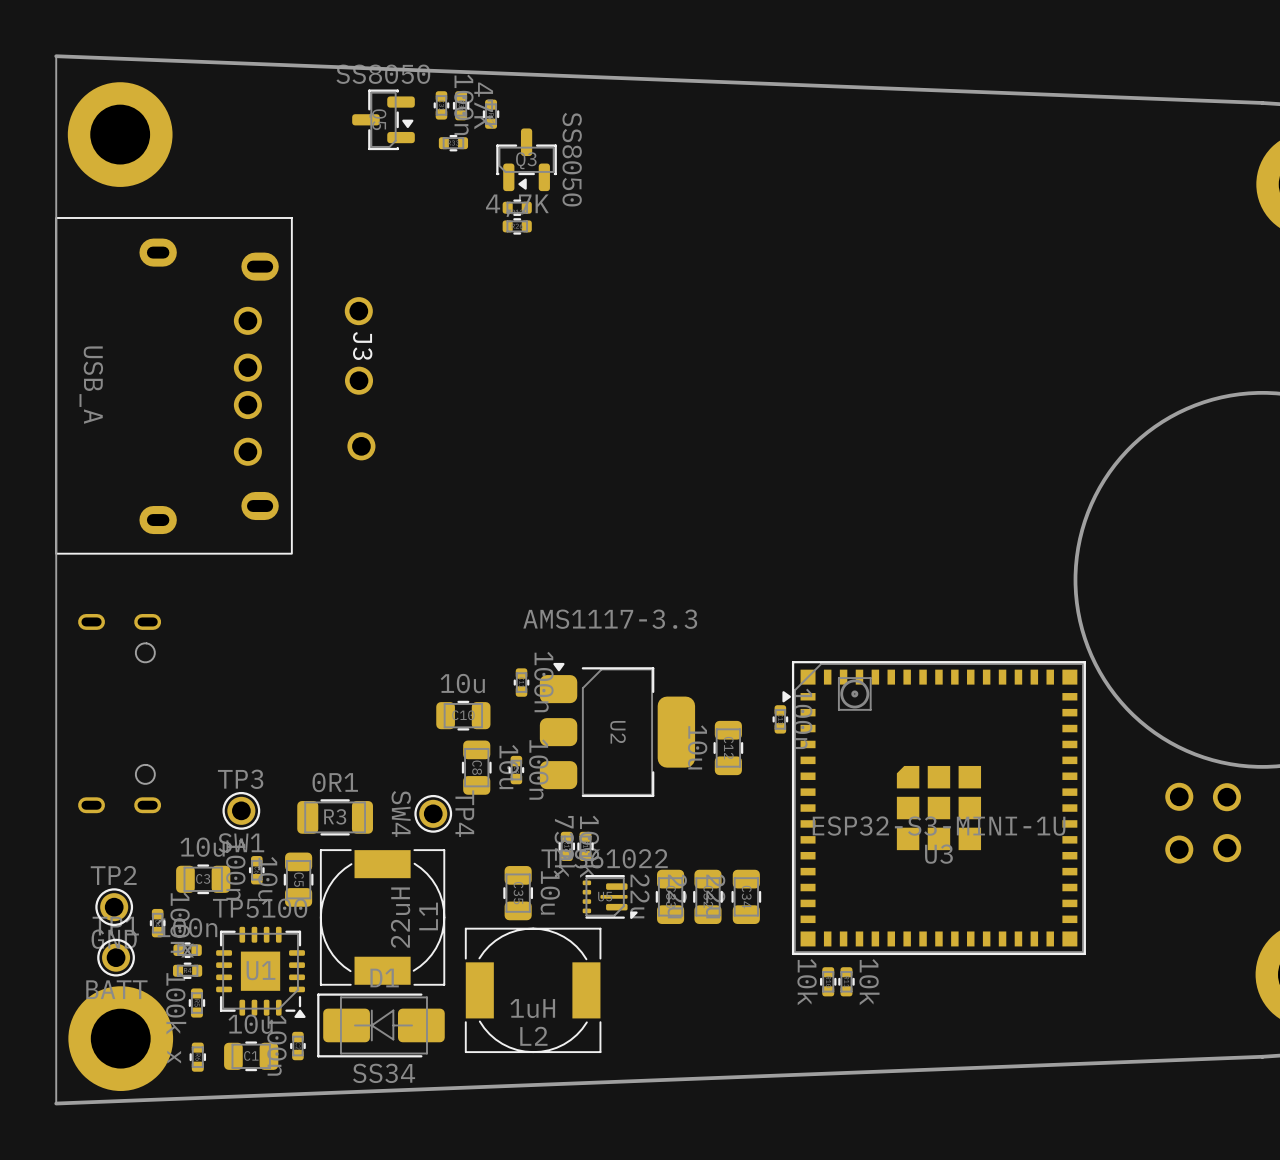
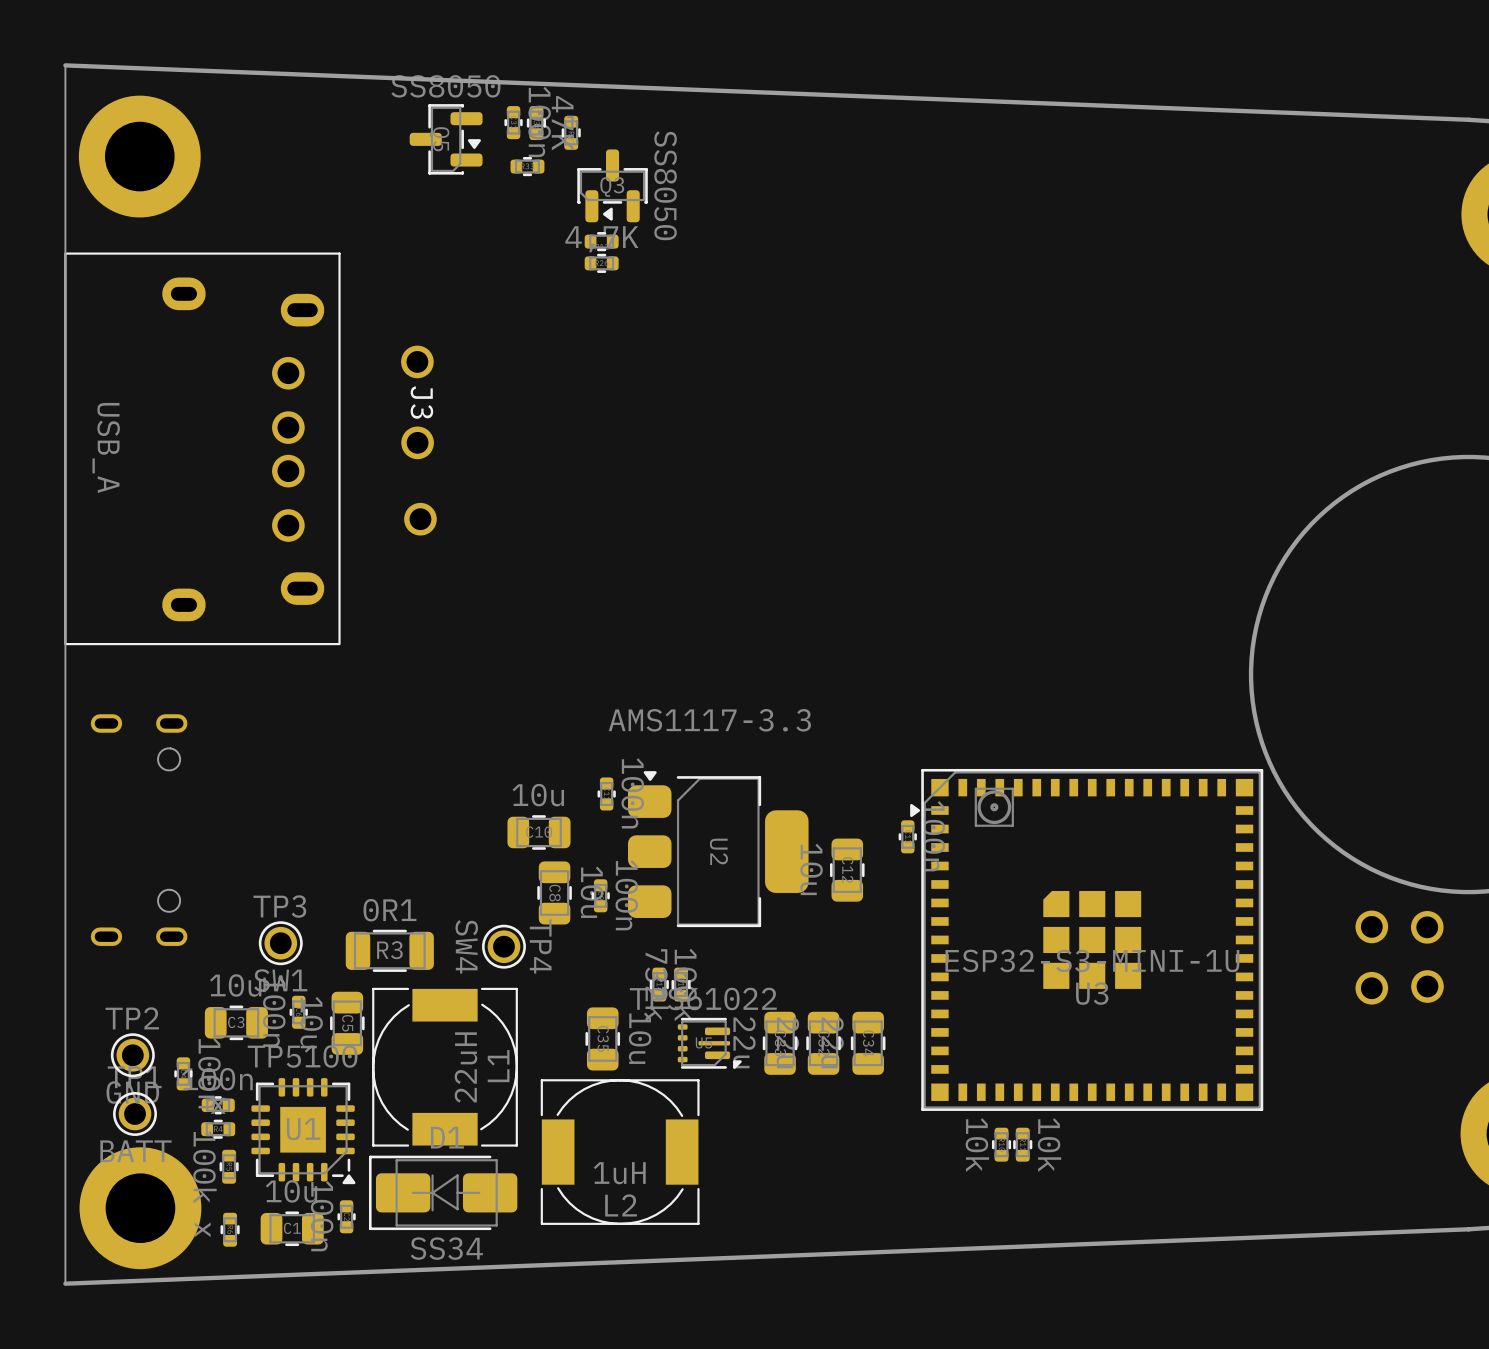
part position: (828, 981) -> (1001, 1144)
part position: (846, 981) -> (1022, 1144)

